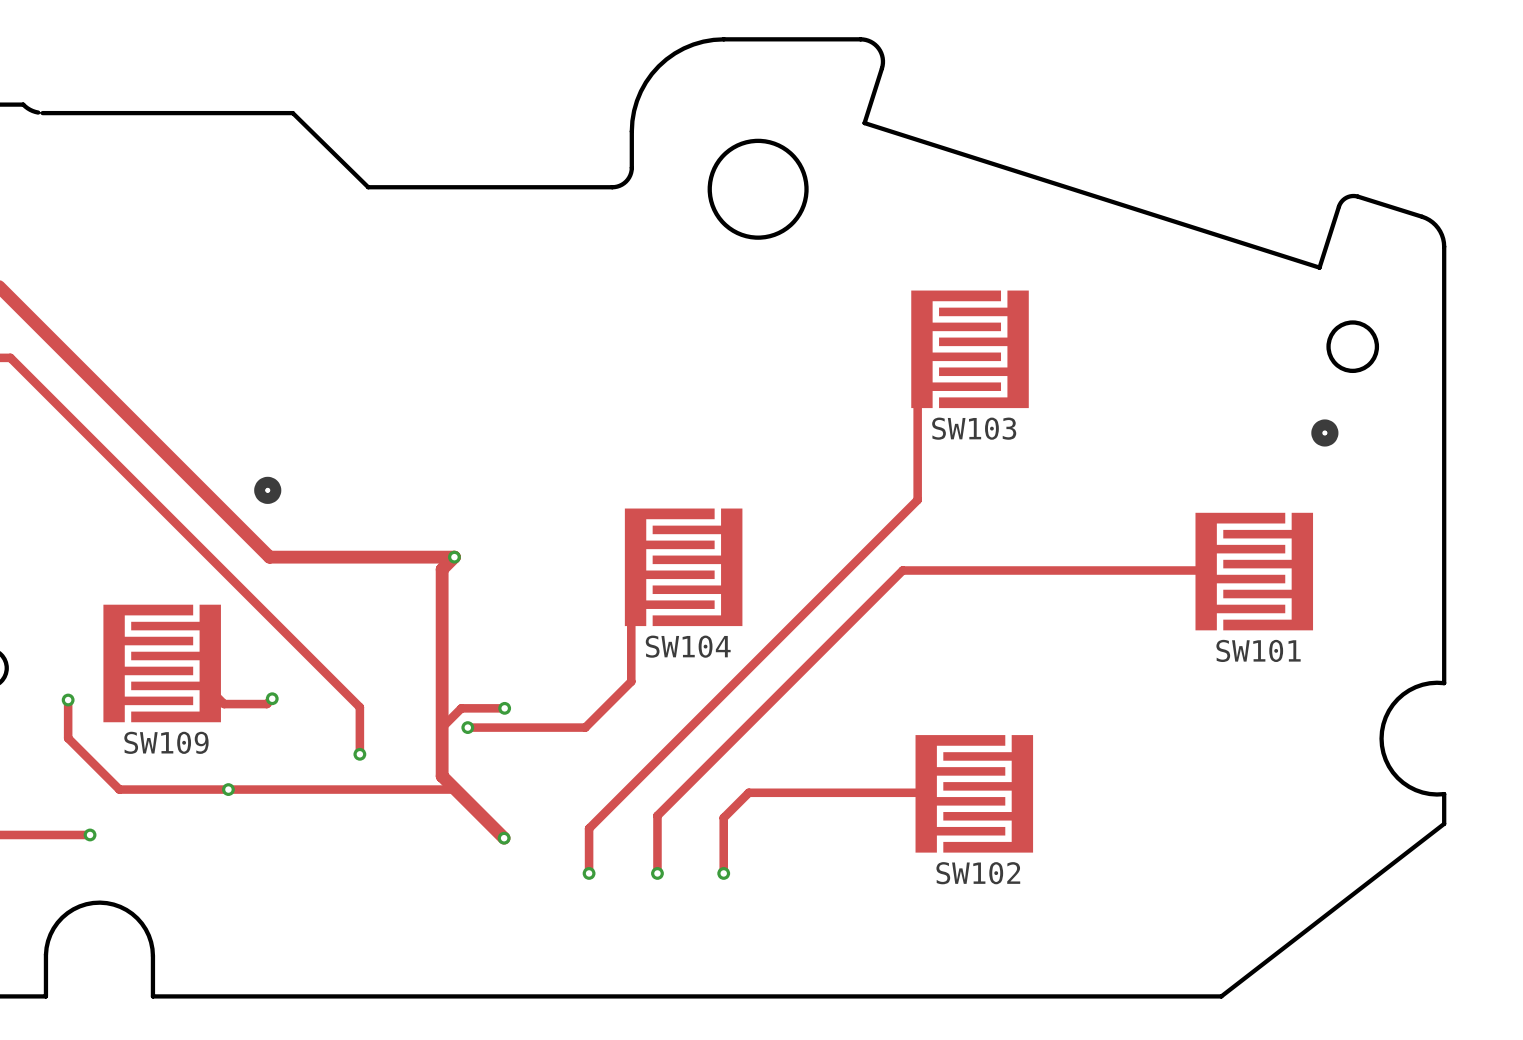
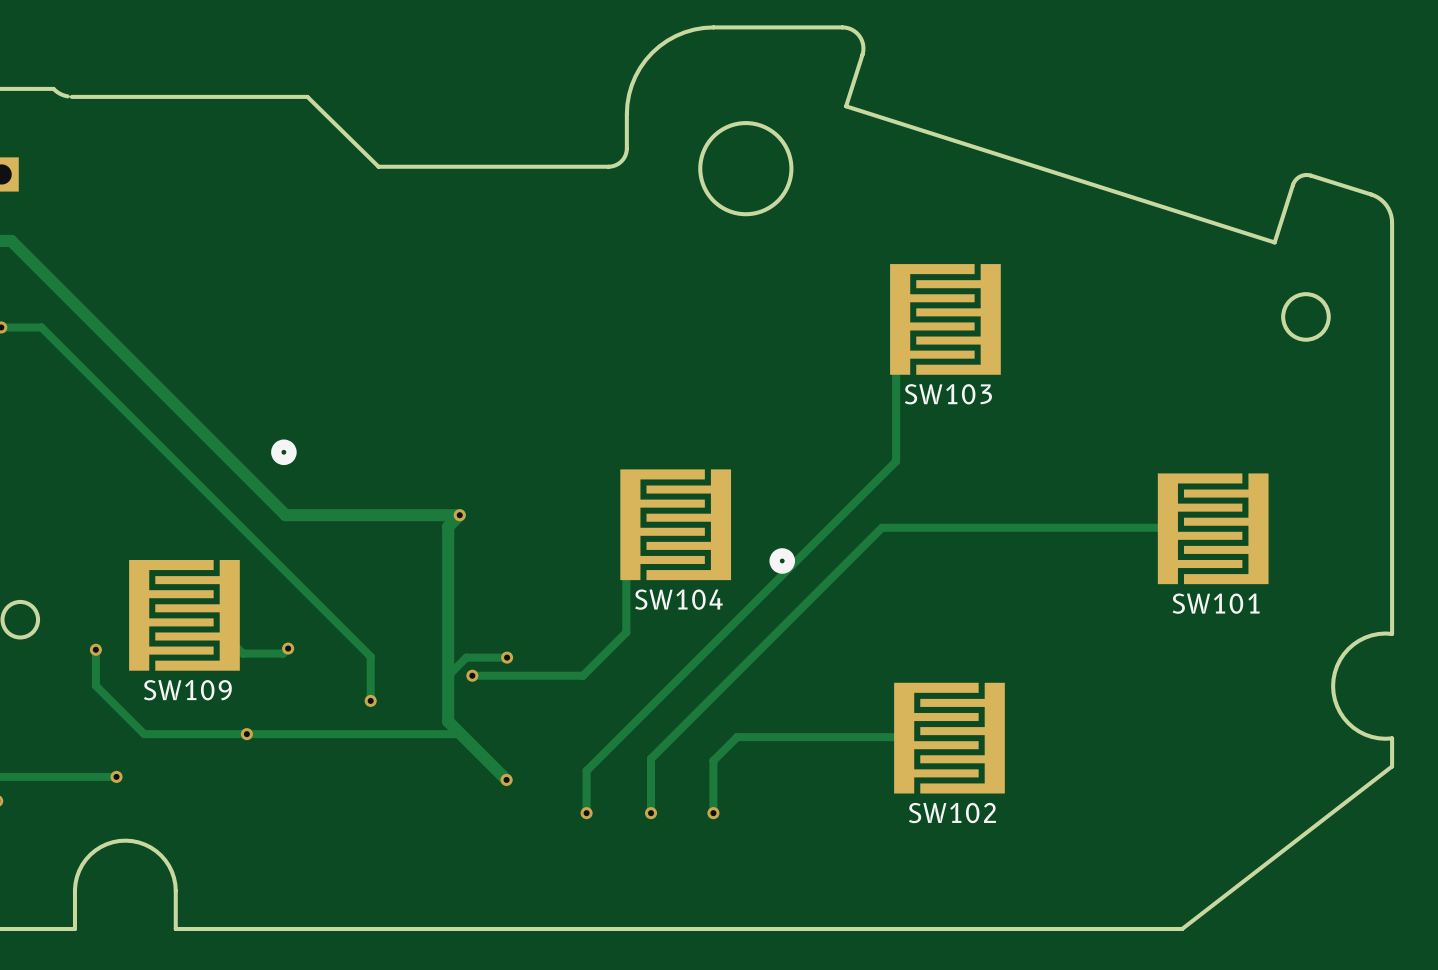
part: (1324, 432) -> none
part: none -> (782, 560)

